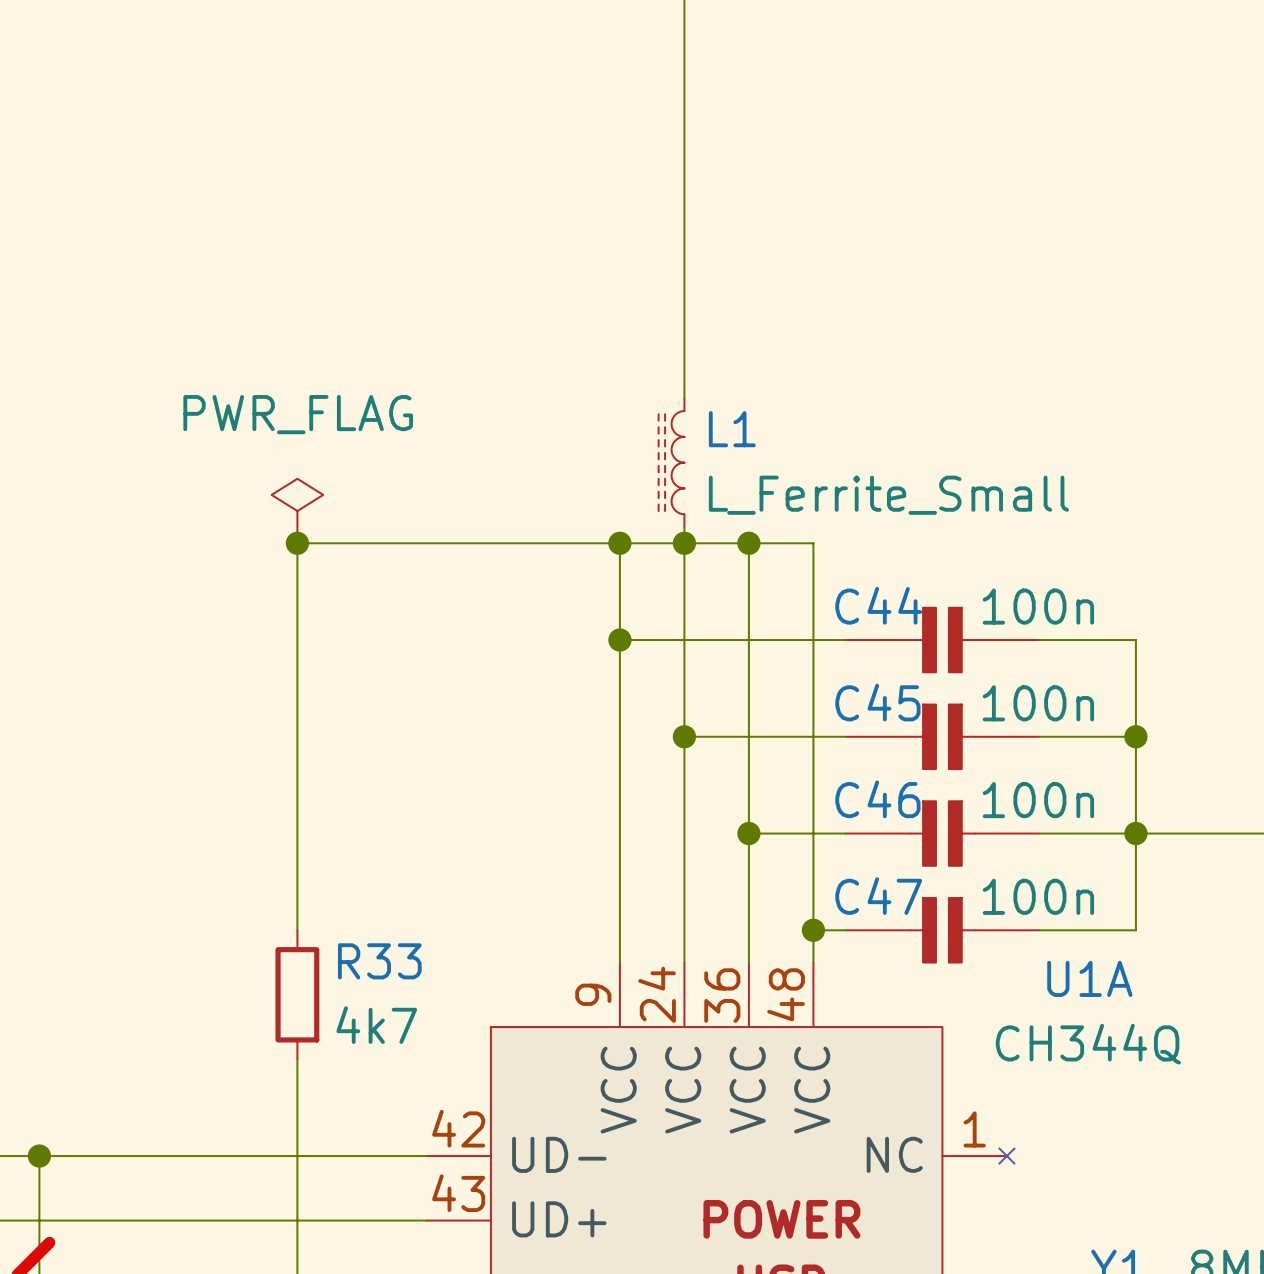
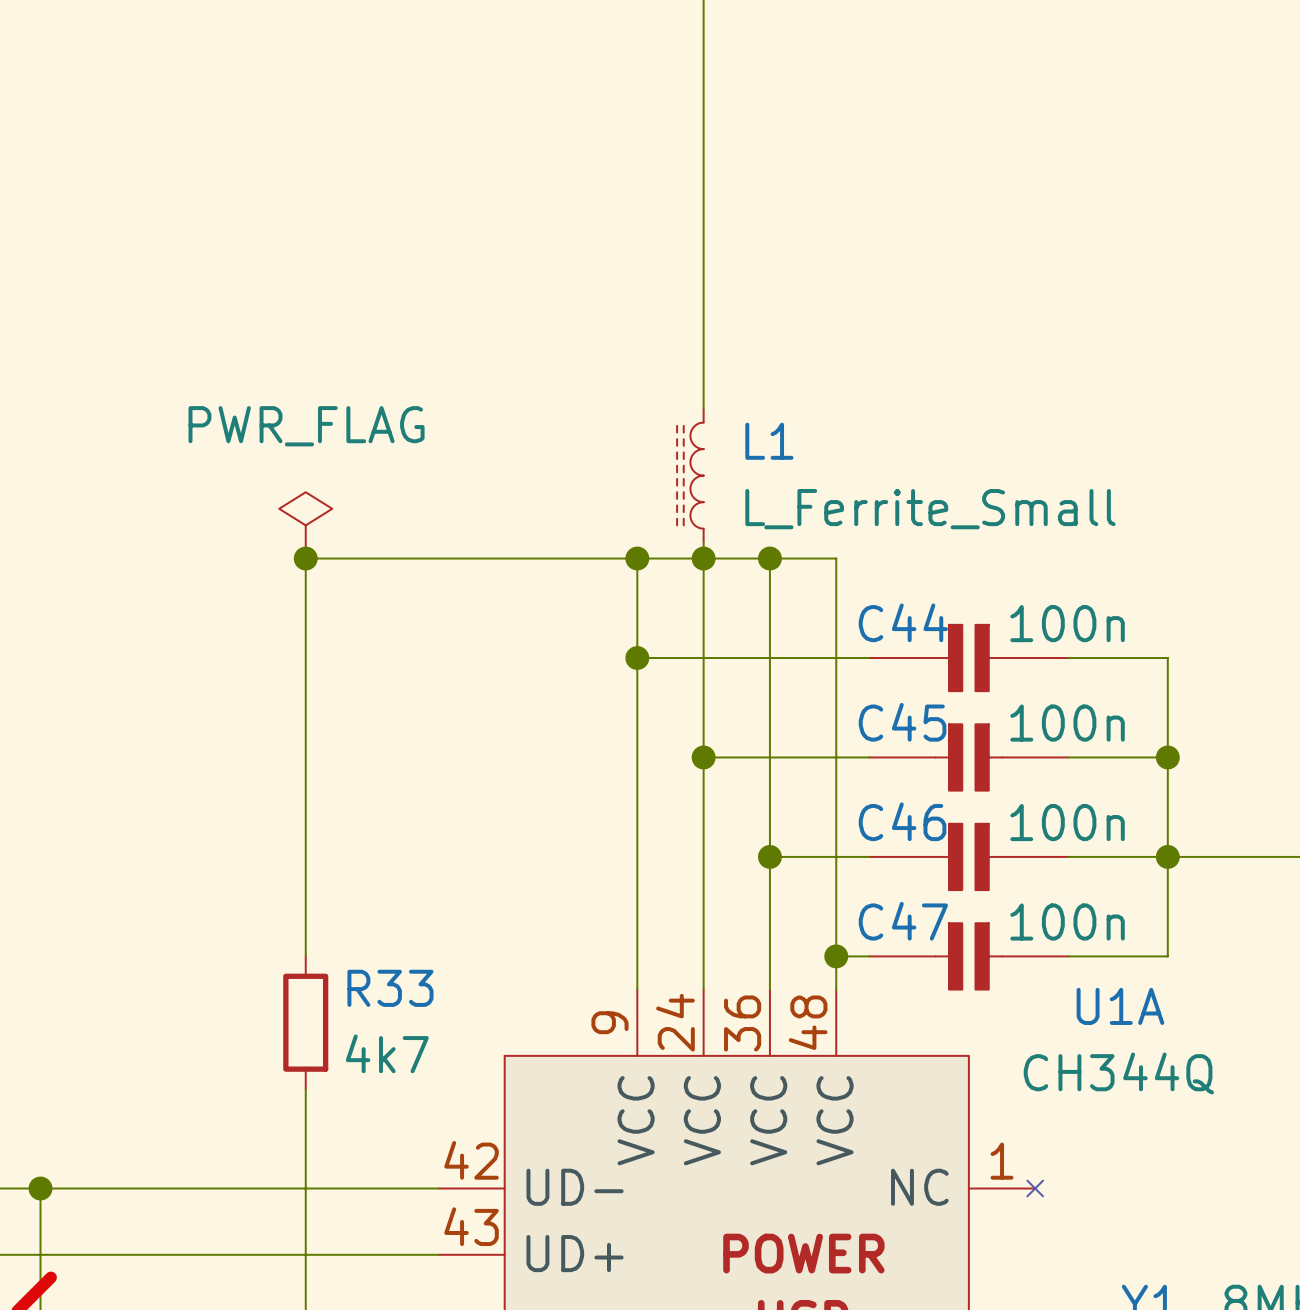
L1 name position: L1 (732, 429) -> L1 (769, 441)
L1 value position: L_Ferrite_Small (888, 495) -> L_Ferrite_Small (930, 509)

